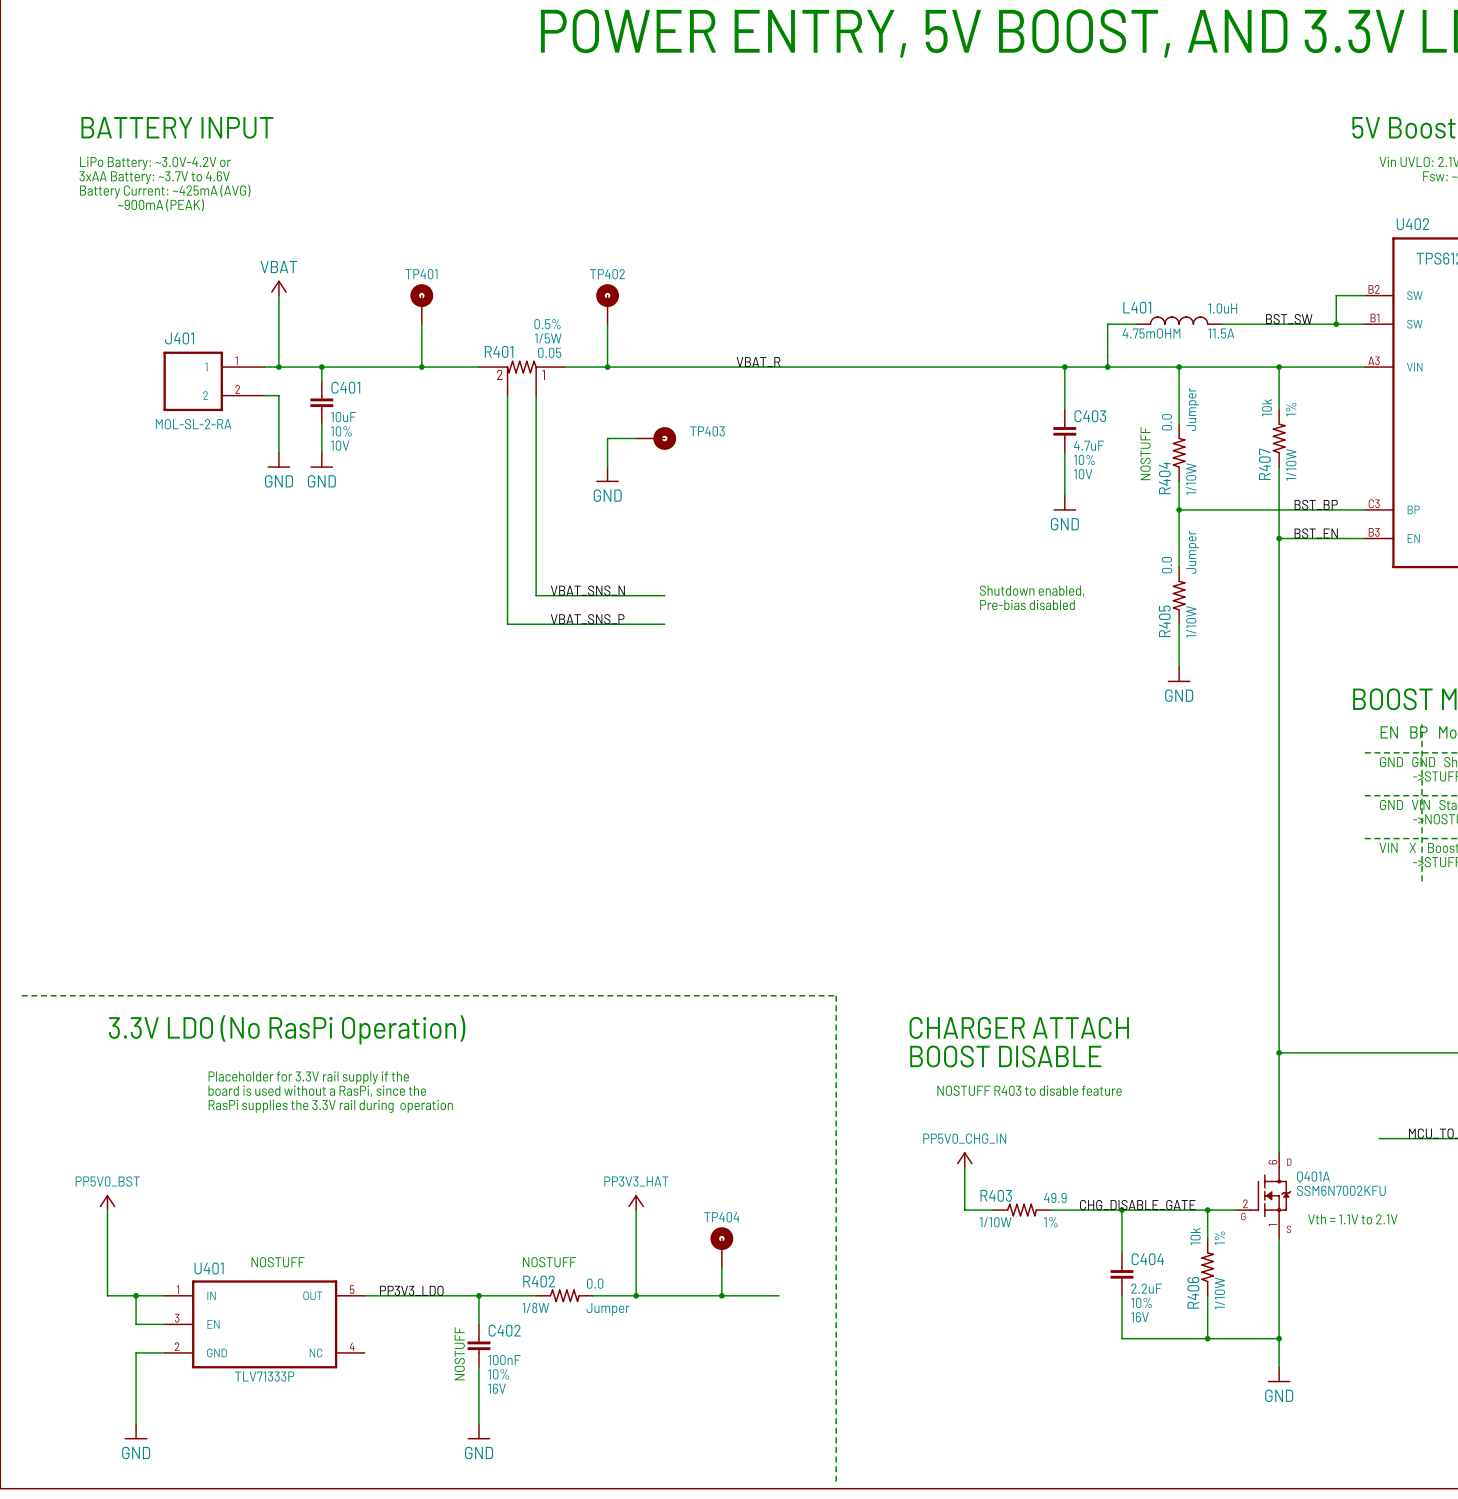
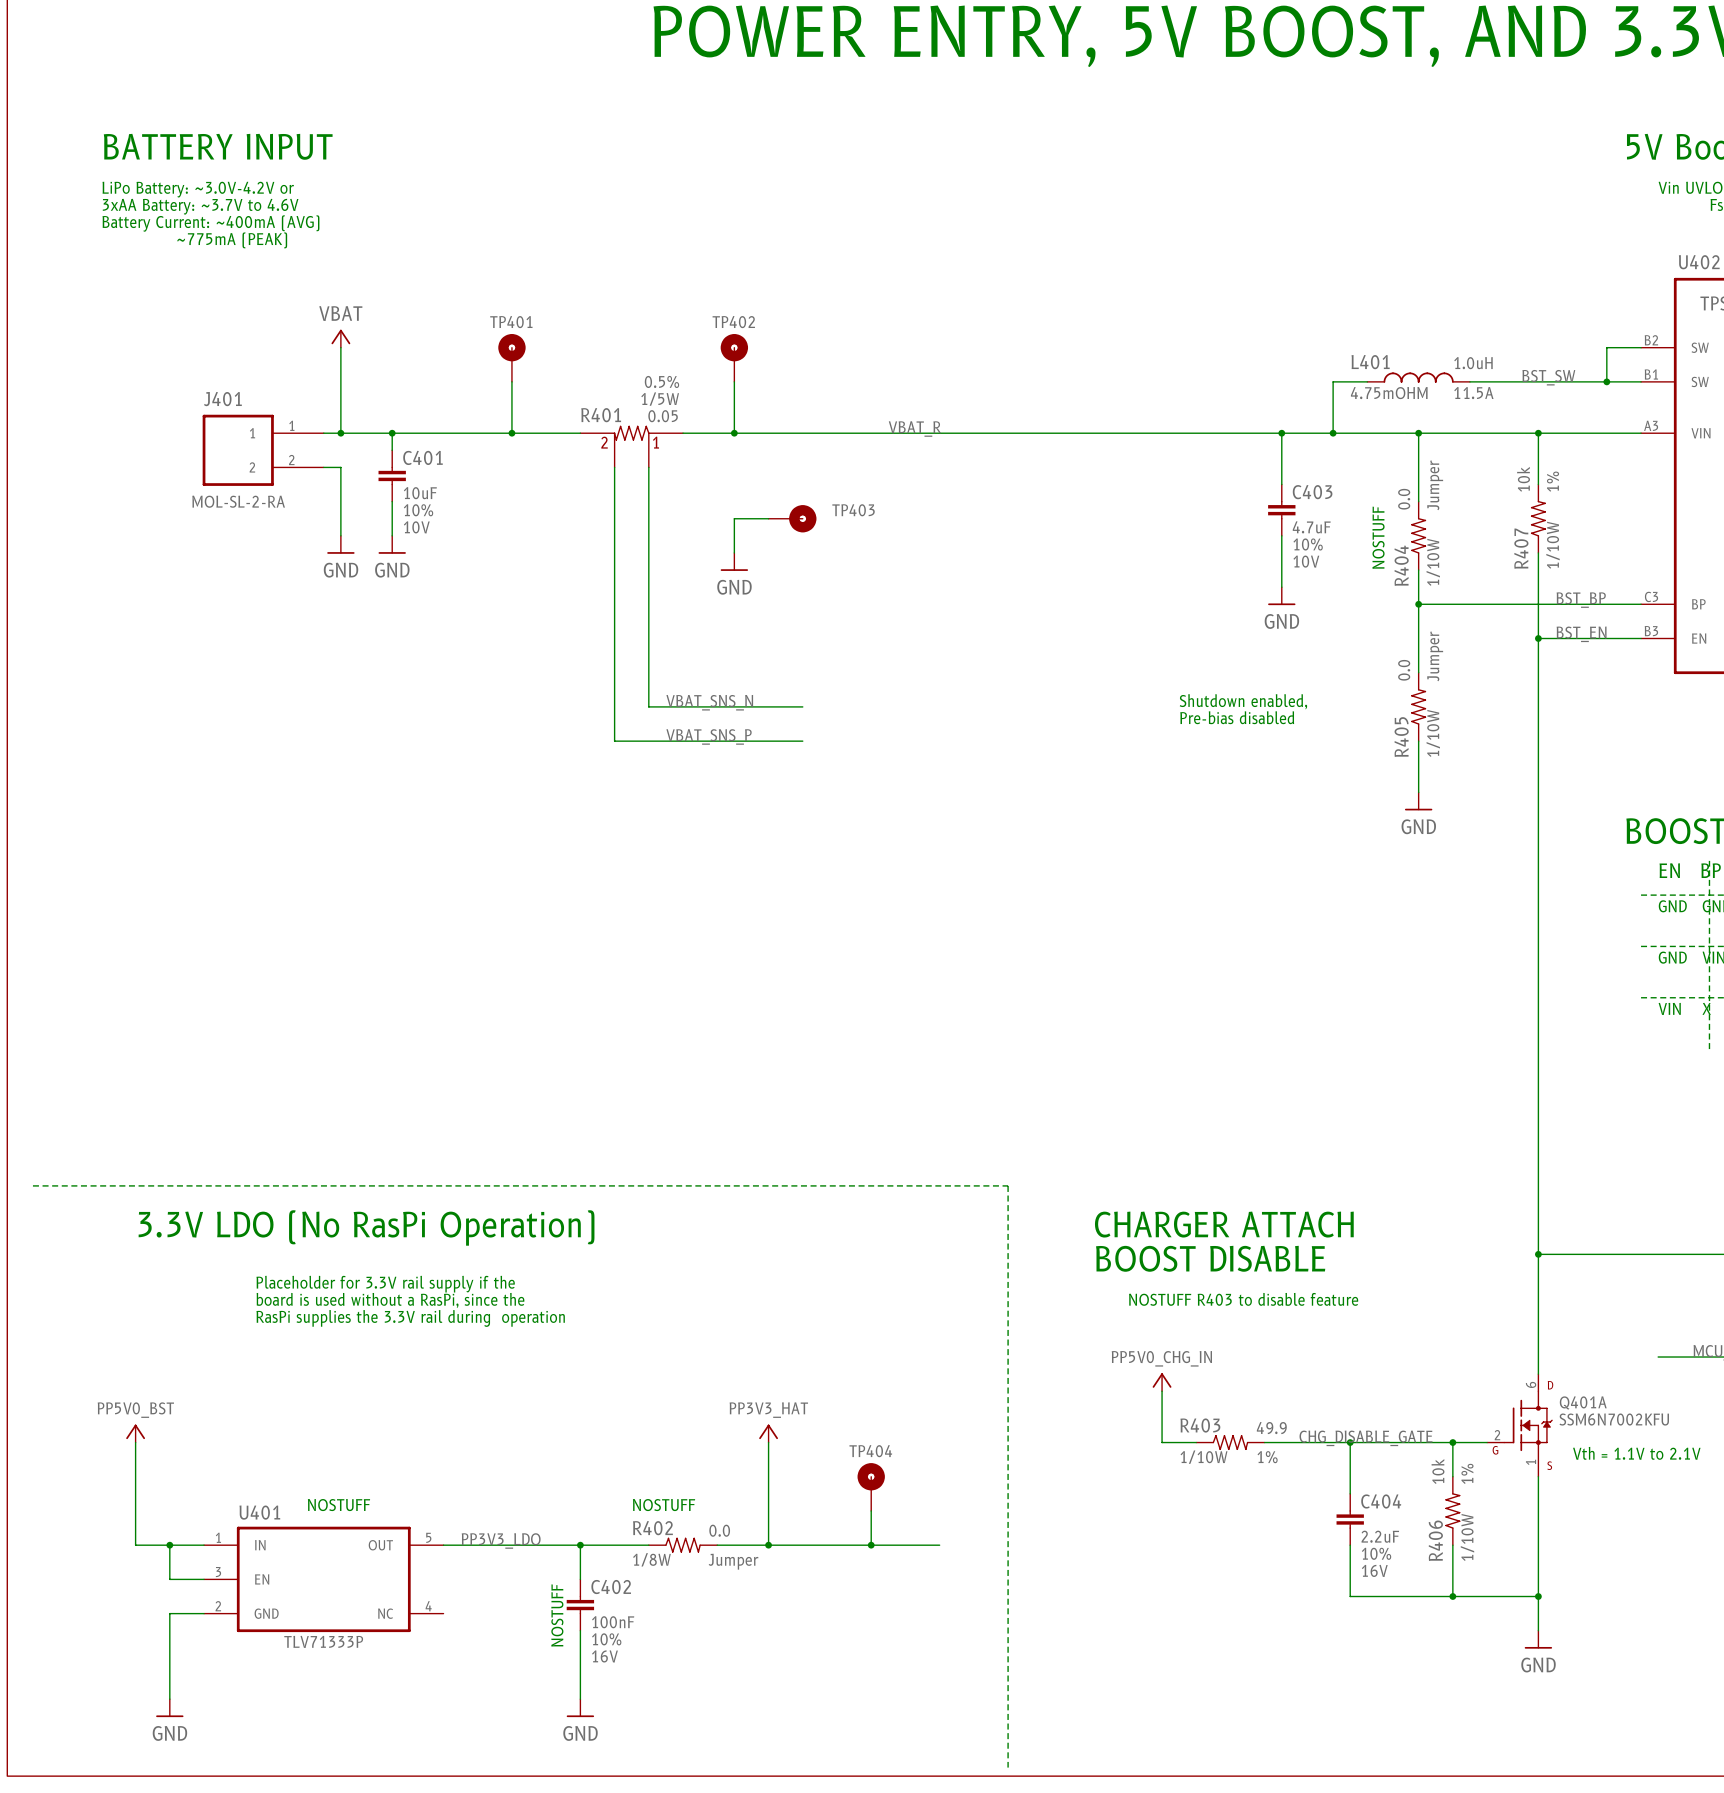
text: Battery Current: ~425mA (AVG) (165, 191) -> Battery Current: ~400mA (AVG) (210, 223)
text: ~900mA (PEAK) (160, 205) -> ~775mA (PEAK) (232, 240)

